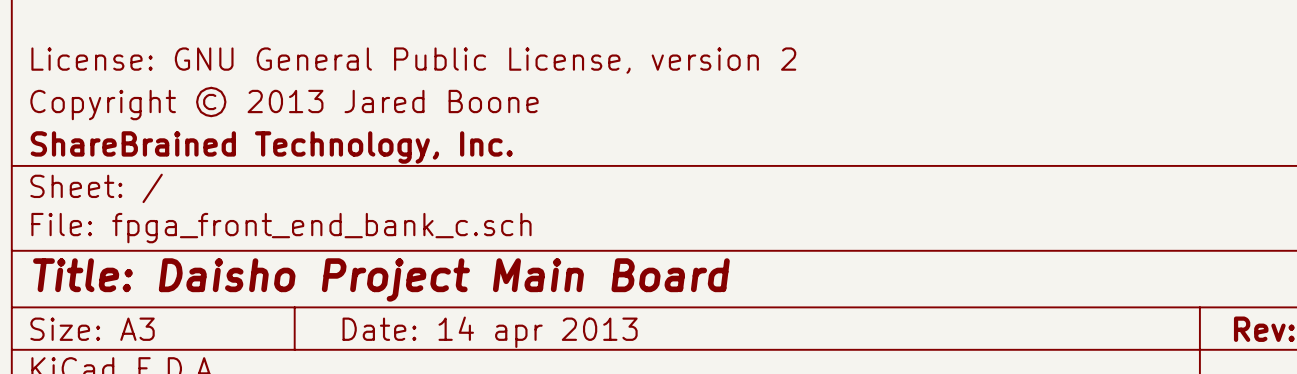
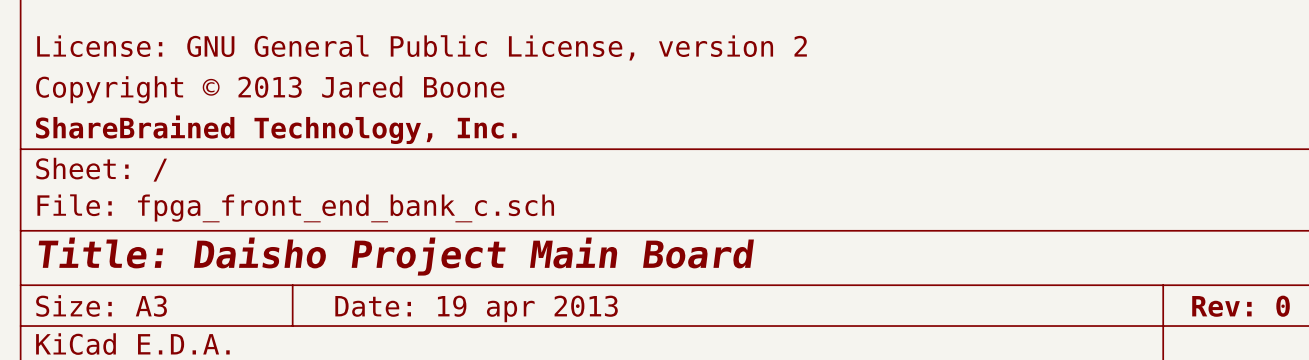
title block: Date: 14 apr 2013 (490, 332) -> Date: 19 apr 2013 (476, 308)

